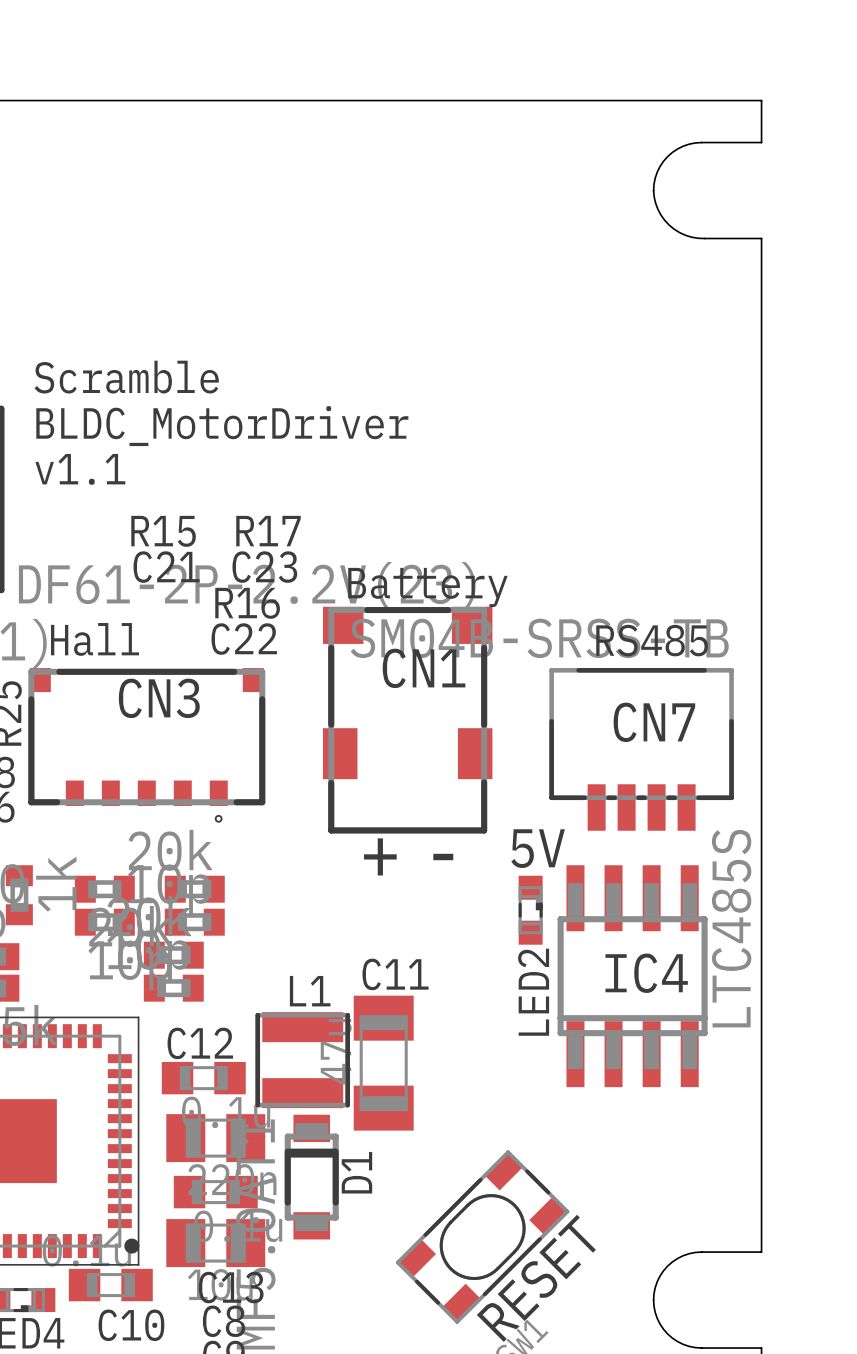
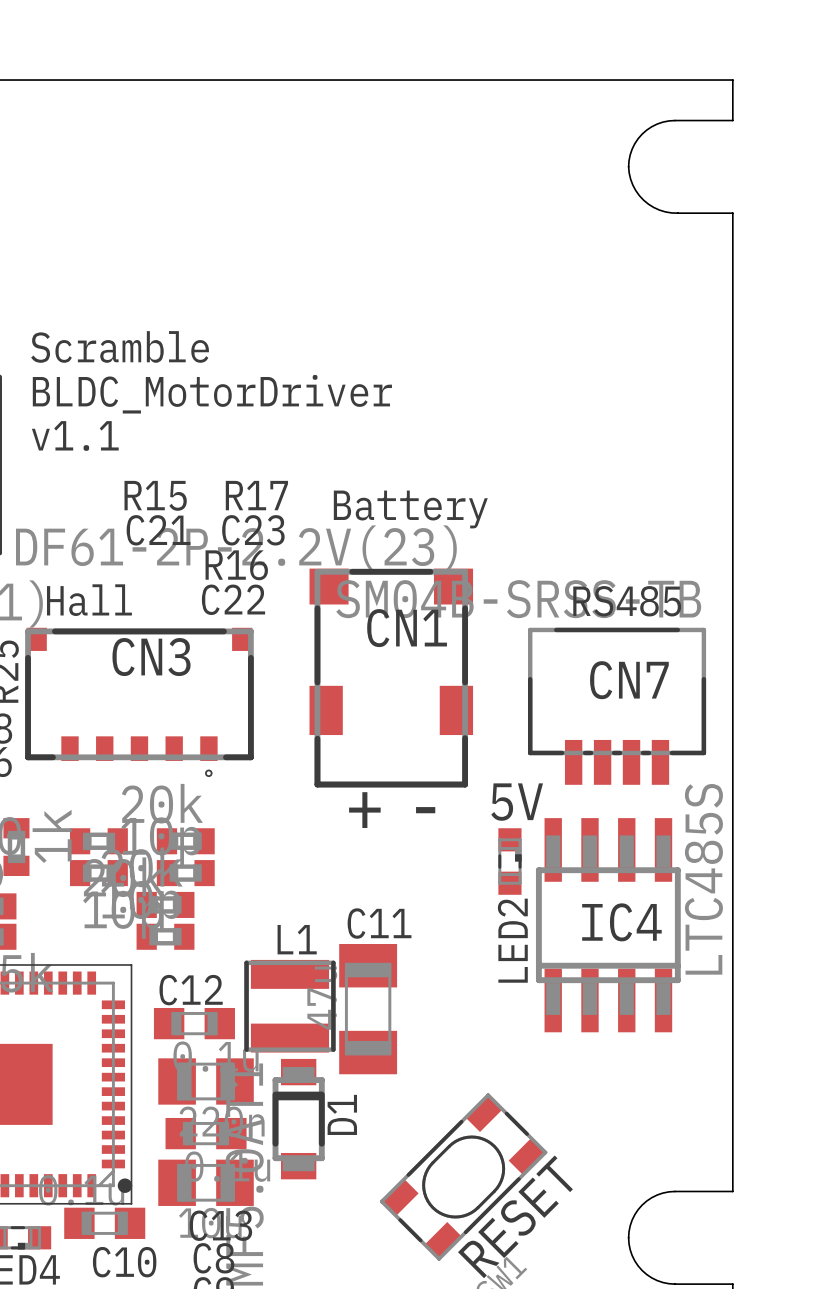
text position: Battery (427, 587) -> Battery (410, 509)

